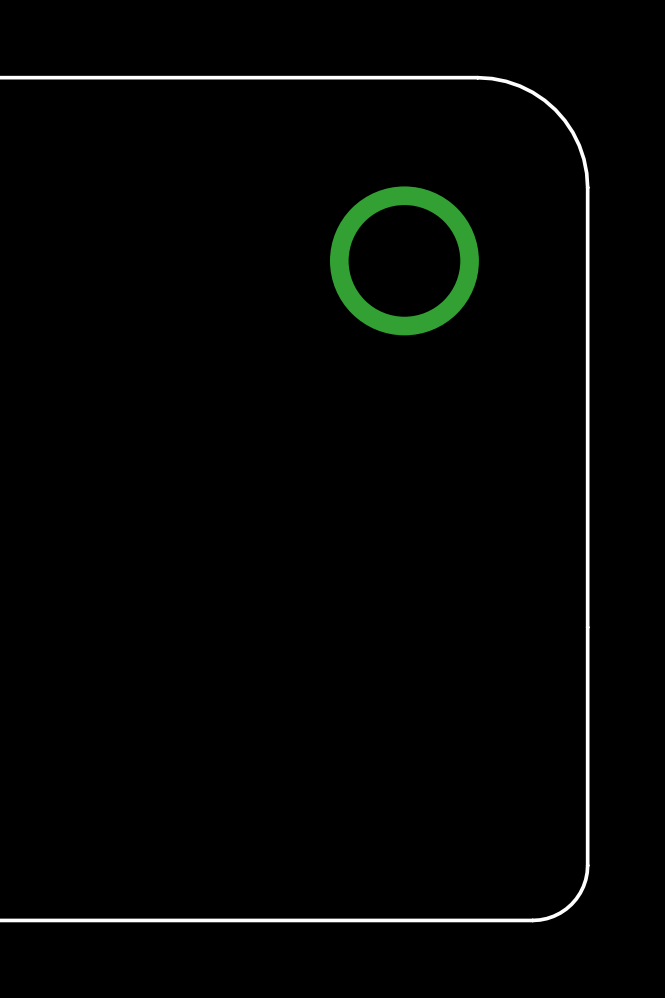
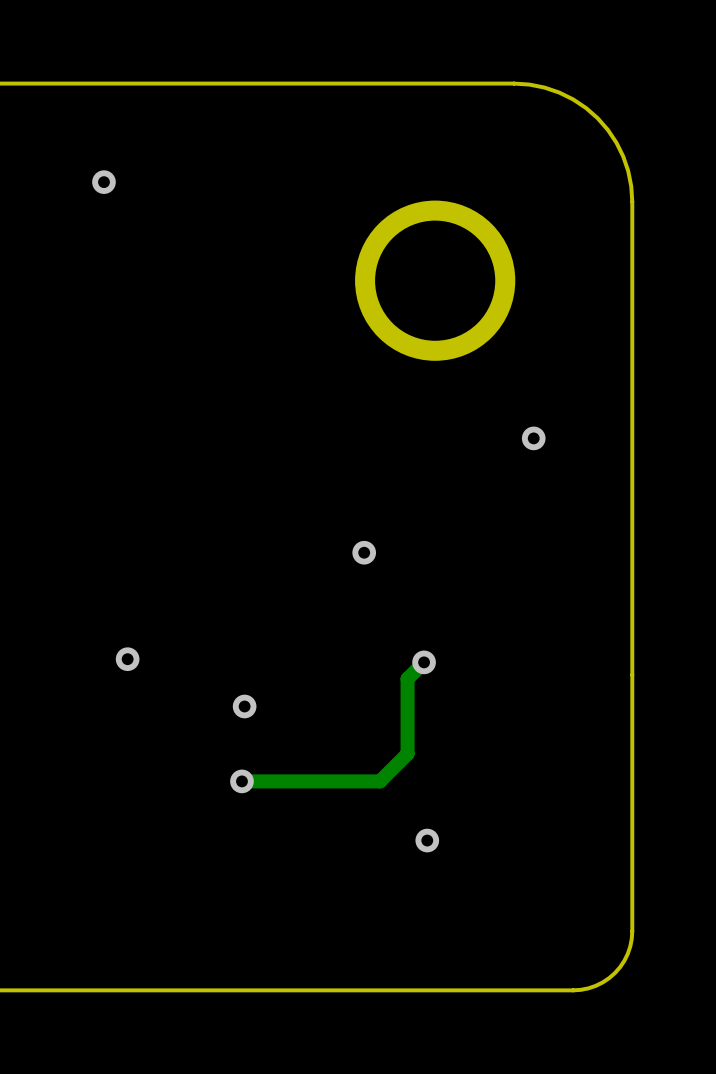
via: none -> (103, 182)
via: none -> (533, 438)
via: none -> (364, 552)
via: none -> (127, 659)
track: none -> (424, 662) (407, 678) (407, 753) (379, 781) (241, 781)
via: none -> (424, 662)
via: none -> (244, 706)
via: none -> (241, 781)
via: none -> (427, 840)

